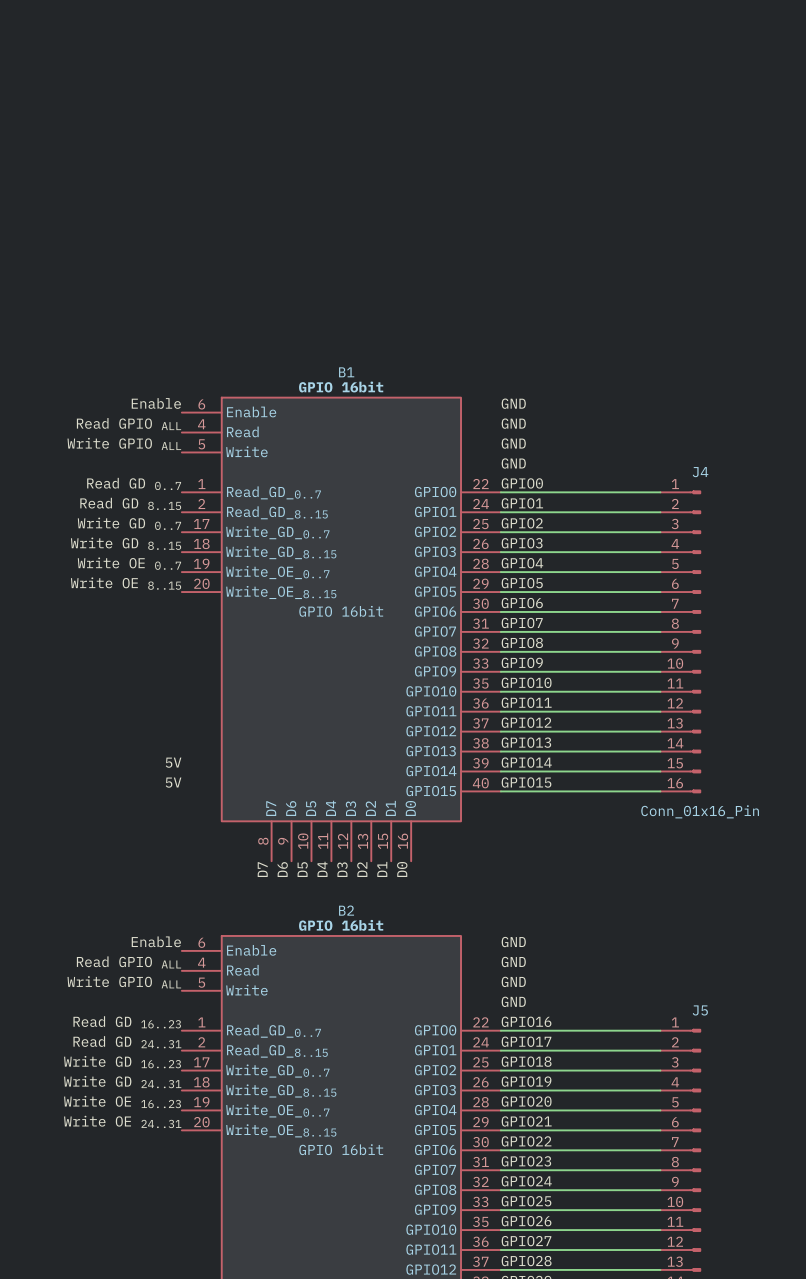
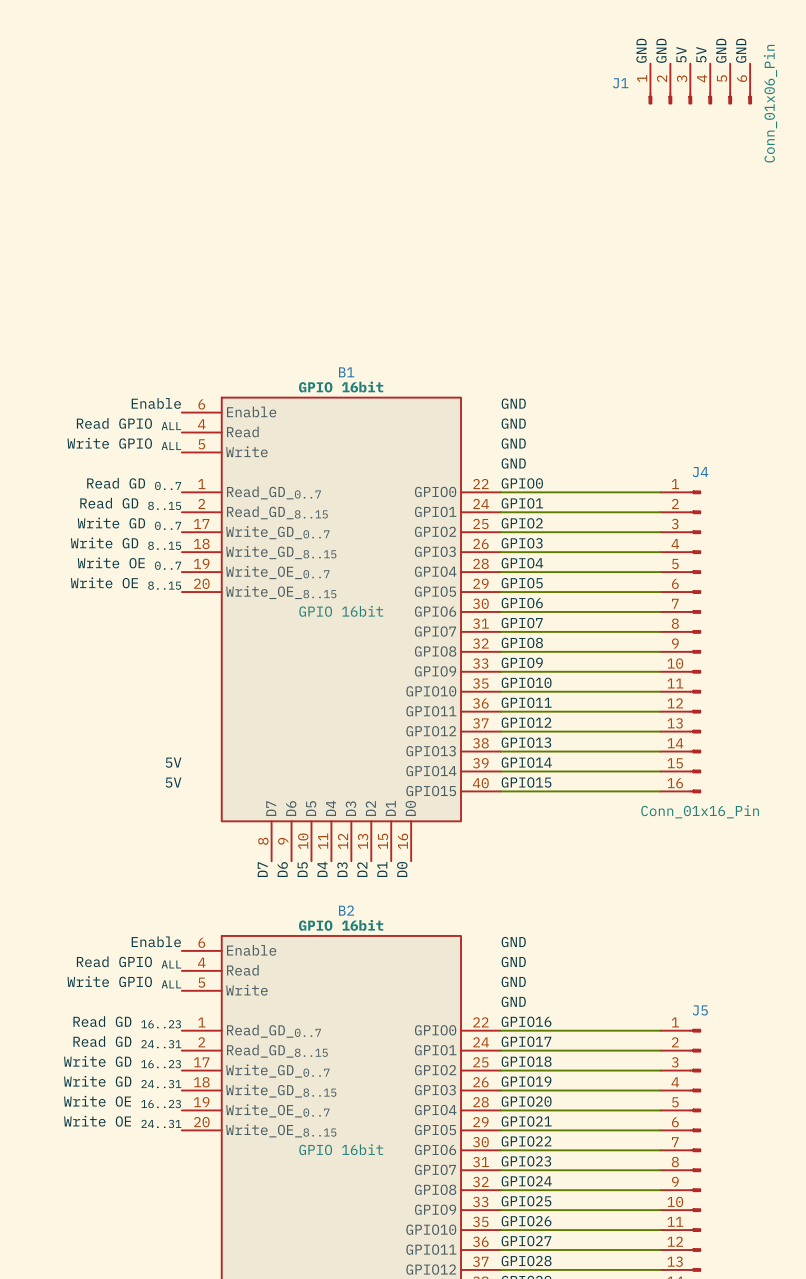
label: none -> GND (641, 50)
label: none -> GND (661, 50)
label: none -> GND (721, 50)
label: none -> GND (741, 50)
label: none -> 5V (681, 54)
label: none -> 5V (701, 54)
J1: none -> Conn_01x06_Pin (700, 83)

